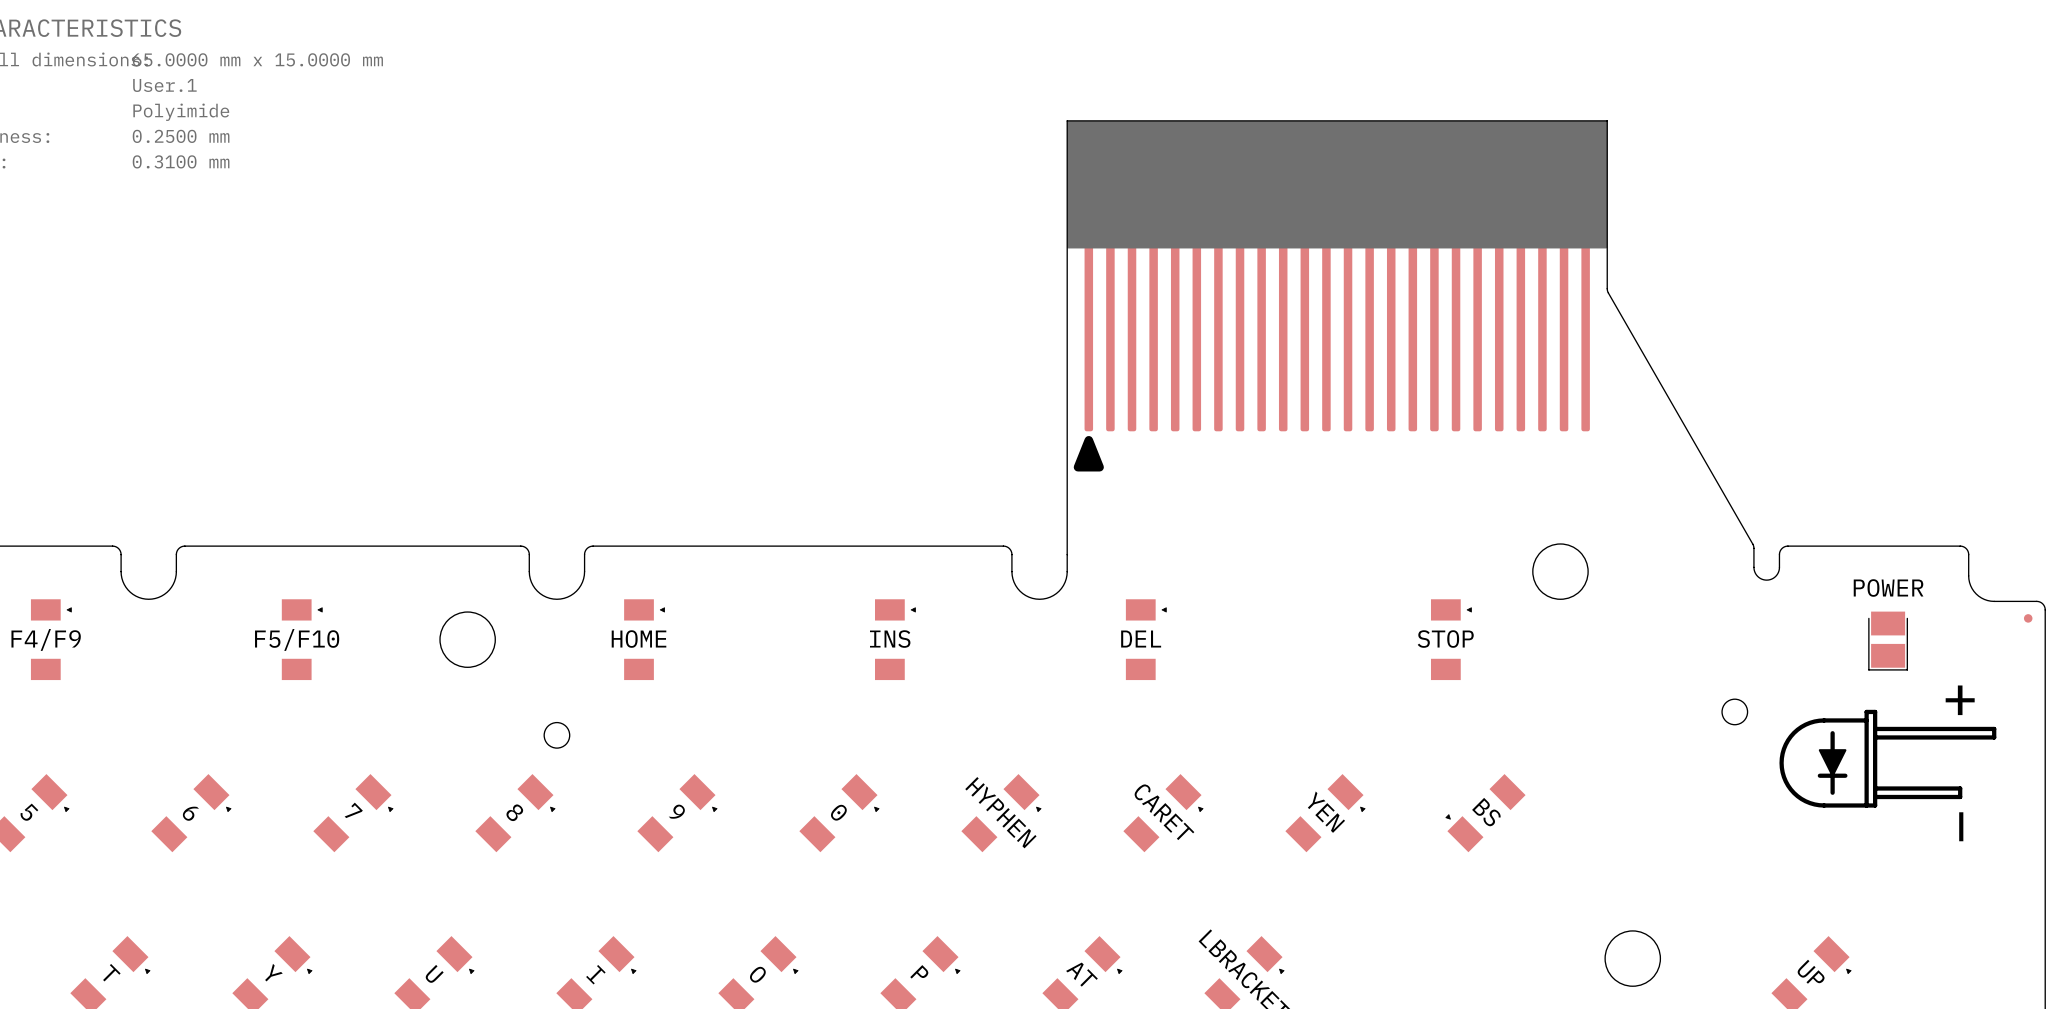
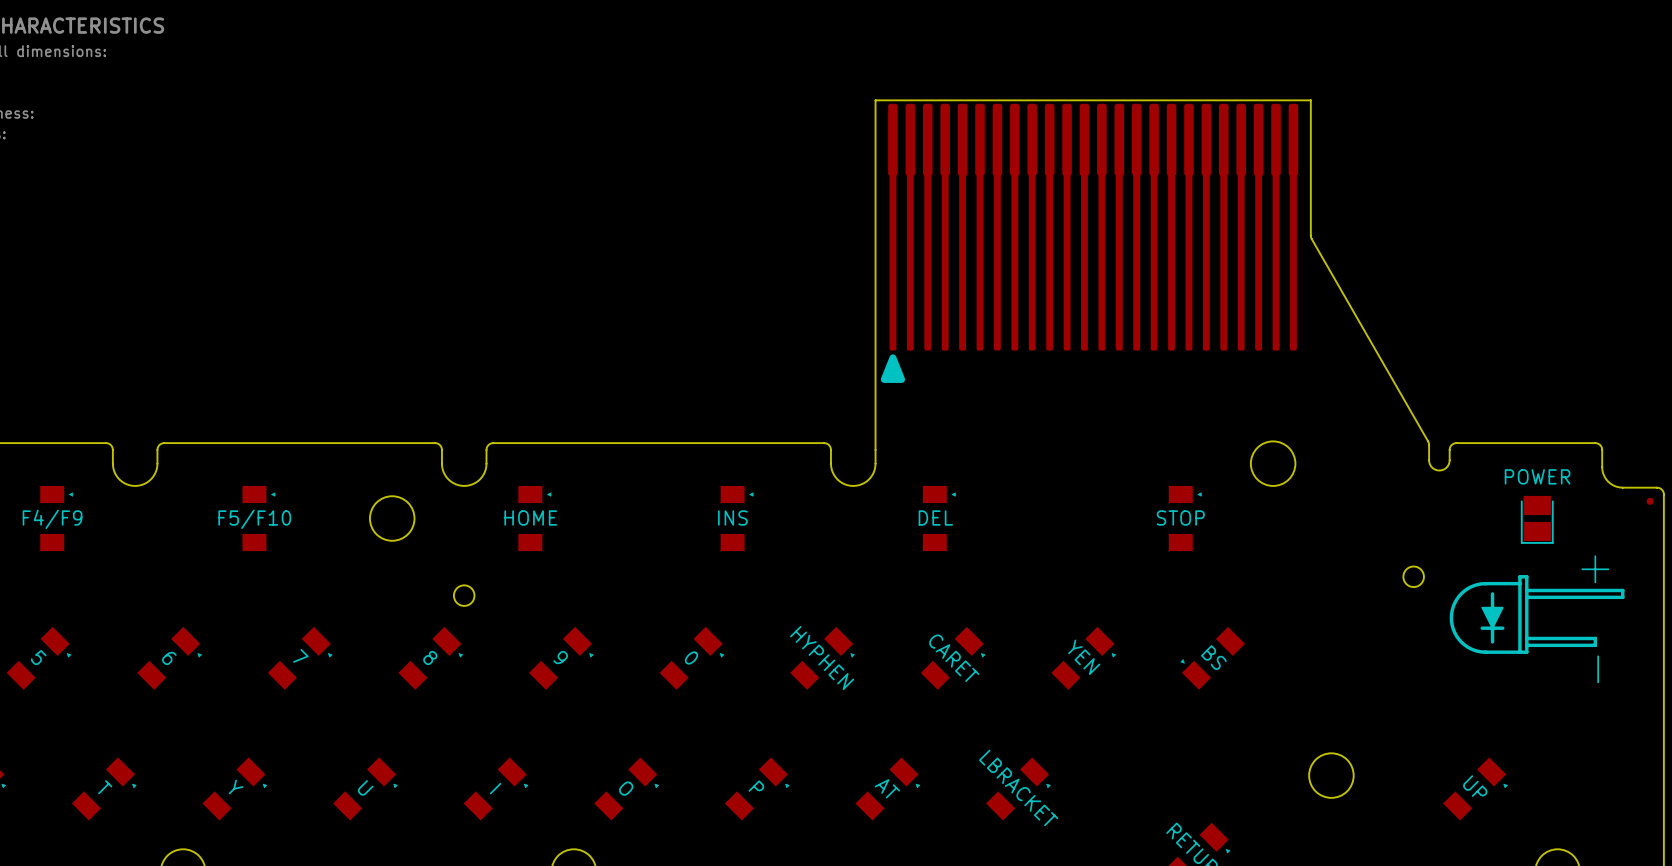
text: 65.0000 mm x 15.0000 mm (257, 59) -> none
text: User.1 (164, 85) -> none
text: Polyimide (181, 112) -> none
drawing: [1067, 120, 1608, 249] -> none
text: 0.2500 mm (181, 136) -> none
text: 0.3100 mm (181, 161) -> none

